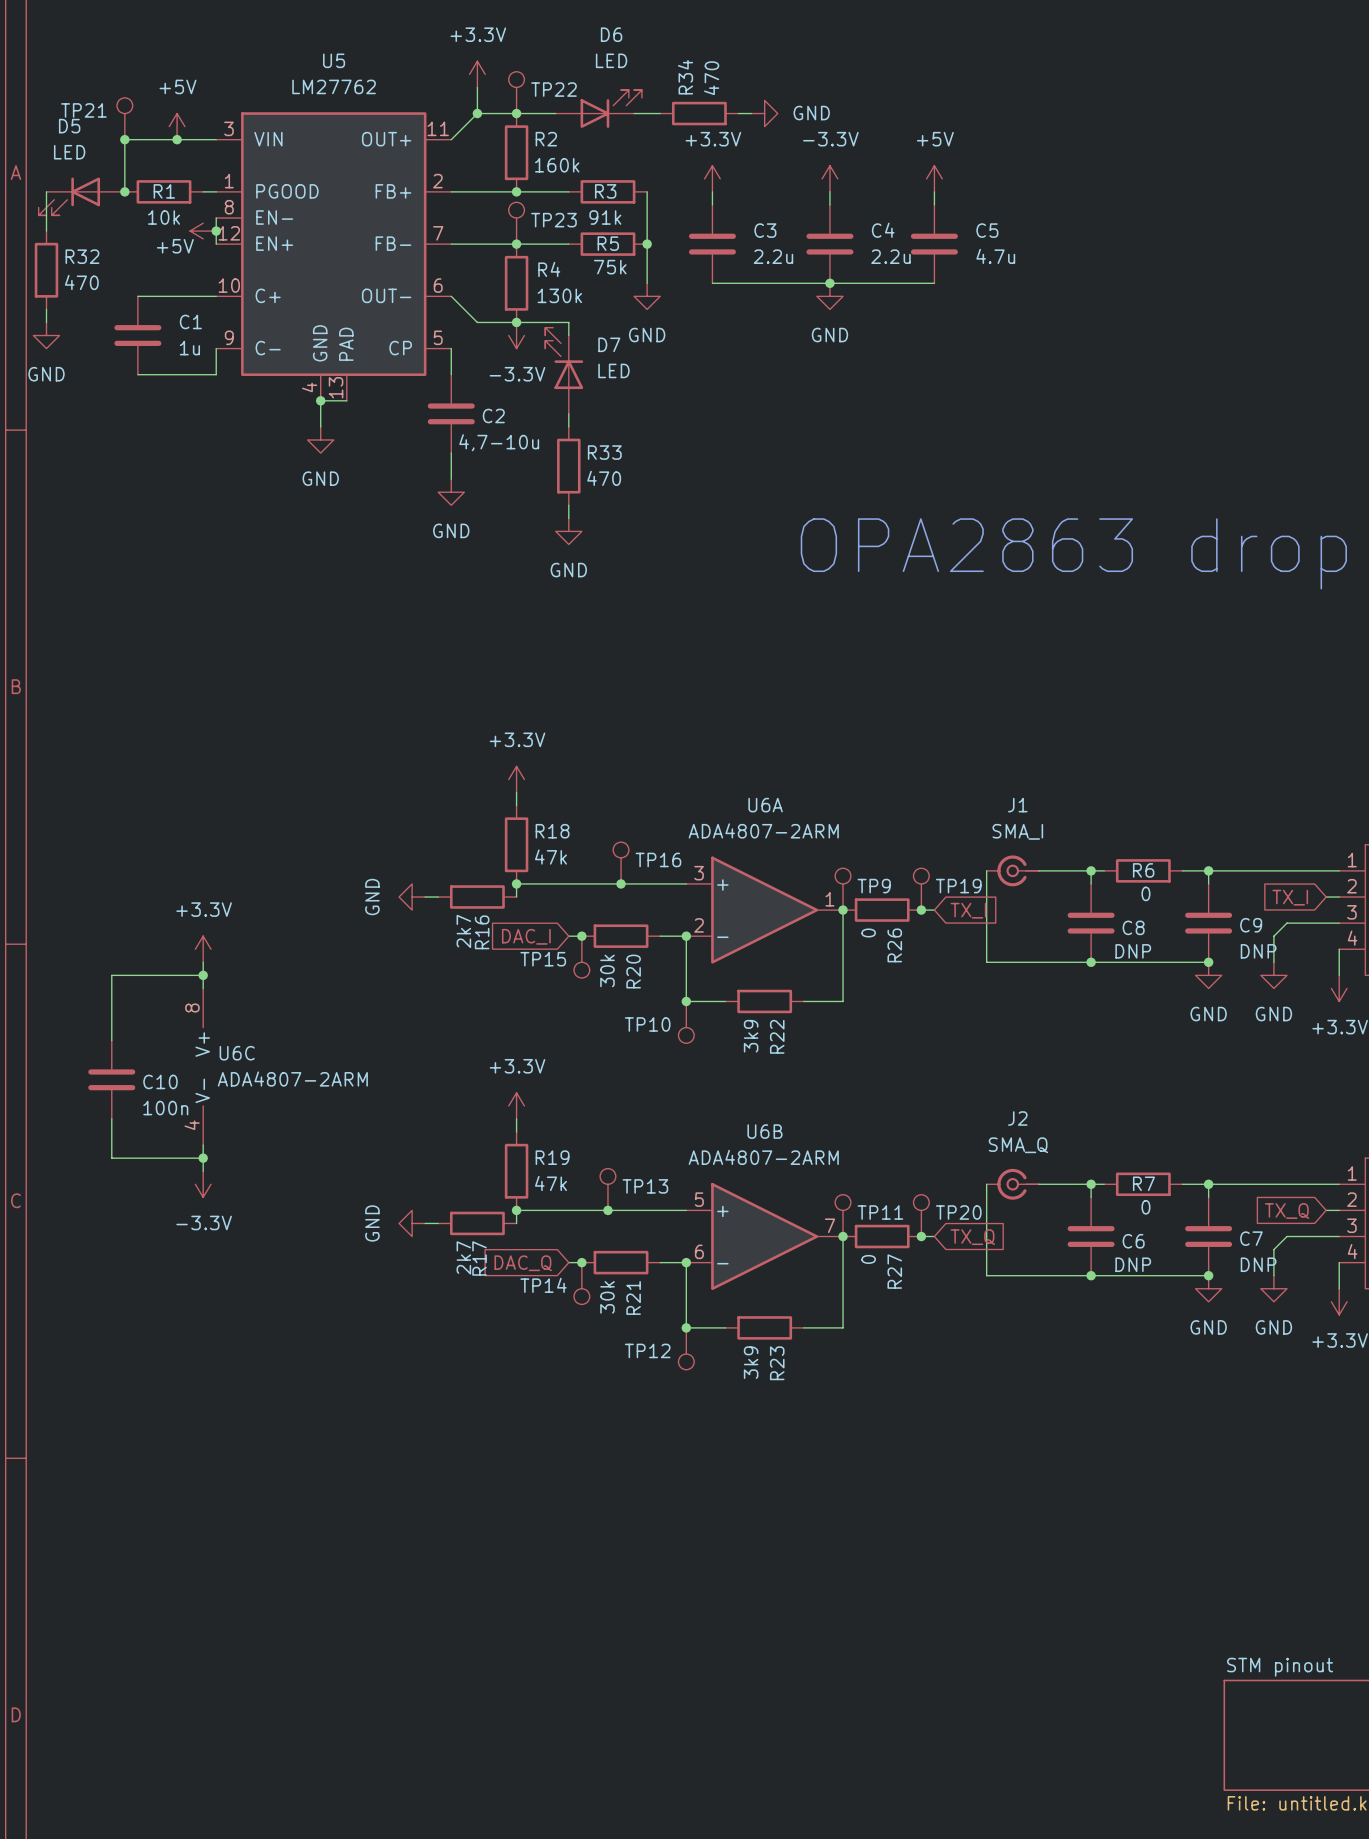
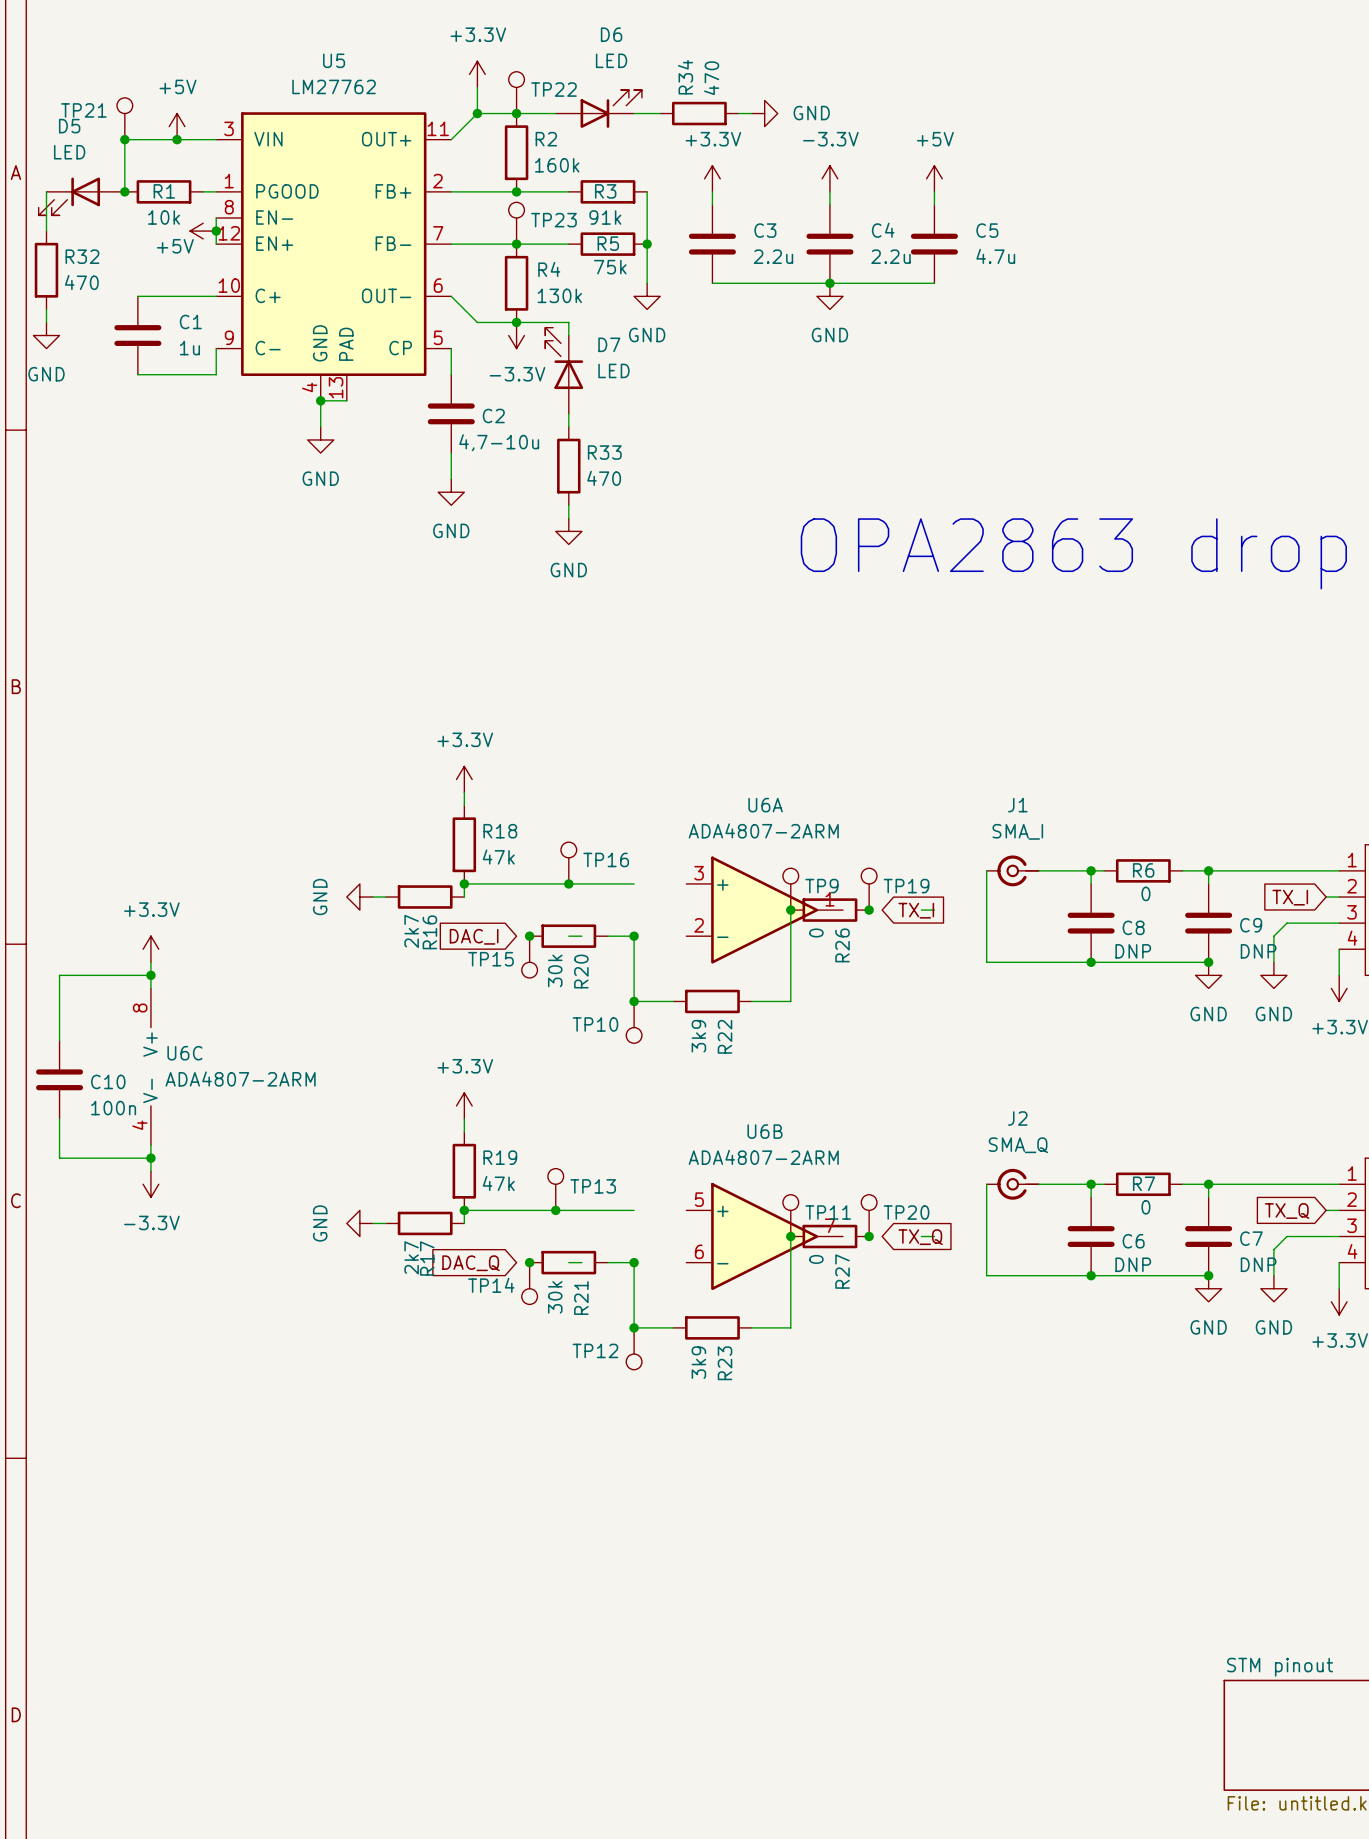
power symbol position: +3.3V (516, 779) -> +3.3V (464, 779)
wire: (516, 792) (516, 805) -> (464, 792) (464, 805)
R18 position: (516, 844) -> (464, 844)
TP16 position: (621, 863) -> (568, 863)
junction: none -> (464, 883)
wire: (516, 883) (516, 897) -> (516, 883) (464, 883) (464, 897)
junction: (516, 883) -> none
junction: none -> (568, 883)
junction: (621, 883) -> none
wire: (634, 883) (686, 883) -> none
TP9 position: (843, 889) -> (790, 889)
TP19 position: (921, 889) -> (869, 889)
power symbol position: GND (412, 897) -> GND (359, 897)
wire: (425, 897) (438, 897) -> (372, 897) (385, 897)
R16 position: (477, 897) -> (425, 897)
junction: none -> (790, 910)
wire: (843, 910) (843, 1001) (803, 1001) -> (790, 910) (790, 1001) (751, 1001)
junction: (843, 910) -> none
junction: none -> (869, 910)
R26 position: (882, 910) -> (829, 910)
junction: (921, 910) -> none
global label position: TX_I (968, 910) -> TX_I (916, 910)
global label position: DAC_I (526, 936) -> DAC_I (474, 936)
junction: none -> (529, 936)
junction: (581, 936) -> none
R20 position: (621, 936) -> (568, 936)
junction: none -> (634, 936)
wire: (660, 936) (686, 936) (686, 1001) (725, 1001) -> (607, 936) (634, 936) (634, 1001) (673, 1001)
junction: (686, 936) -> none
power symbol position: +3.3V (203, 949) -> +3.3V (150, 949)
TP15 position: (581, 957) -> (529, 957)
wire: (203, 962) (203, 988) -> (150, 962) (150, 988)
wire: (111, 975) (111, 1040) -> (111, 975) (59, 975) (59, 1040)
wire: (150, 975) (203, 975) -> none
junction position: (203, 975) -> (150, 975)
junction: none -> (634, 1001)
junction: (686, 1001) -> none
R22 position: (764, 1001) -> (712, 1001)
TP10 position: (686, 1022) -> (634, 1022)
U6C position: (203, 1066) -> (150, 1066)
C10 position: (111, 1079) -> (59, 1079)
power symbol position: +3.3V (516, 1105) -> +3.3V (464, 1105)
wire: (111, 1118) (111, 1158) -> (59, 1118) (59, 1158) (111, 1158)
wire: (516, 1118) (516, 1132) -> (464, 1118) (464, 1132)
wire: (203, 1145) (203, 1171) -> (150, 1145) (150, 1171)
wire: (150, 1158) (203, 1158) -> none
junction position: (203, 1158) -> (150, 1158)
R19 position: (516, 1171) -> (464, 1171)
power symbol position: -3.3V (203, 1184) -> -3.3V (150, 1184)
TP13 position: (607, 1189) -> (555, 1189)
junction: none -> (464, 1210)
wire: (516, 1210) (516, 1223) -> (516, 1210) (464, 1210) (464, 1223)
junction: (516, 1210) -> none
junction: none -> (555, 1210)
junction: (607, 1210) -> none
wire: (634, 1210) (686, 1210) -> none
TP11 position: (843, 1215) -> (790, 1215)
TP20 position: (921, 1215) -> (869, 1215)
power symbol position: GND (412, 1223) -> GND (359, 1223)
wire: (425, 1223) (438, 1223) -> (372, 1223) (385, 1223)
R17 position: (477, 1223) -> (425, 1223)
junction: none -> (790, 1236)
wire: (843, 1236) (843, 1327) (803, 1327) -> (790, 1236) (790, 1327) (751, 1327)
junction: (843, 1236) -> none
junction: none -> (869, 1236)
R27 position: (882, 1236) -> (829, 1236)
junction: (921, 1236) -> none
global label position: TX_Q (972, 1237) -> TX_Q (920, 1237)
junction: none -> (529, 1262)
junction: (581, 1262) -> none
R21 position: (621, 1262) -> (568, 1262)
junction: none -> (634, 1262)
wire: (660, 1262) (686, 1262) (686, 1327) (725, 1327) -> (607, 1262) (634, 1262) (634, 1327) (673, 1327)
junction: (686, 1262) -> none
global label position: DAC_Q (523, 1263) -> DAC_Q (471, 1263)
TP14 position: (581, 1283) -> (529, 1283)
junction: none -> (634, 1327)
junction: (686, 1327) -> none
R23 position: (764, 1327) -> (712, 1327)
TP12 position: (686, 1348) -> (634, 1348)

